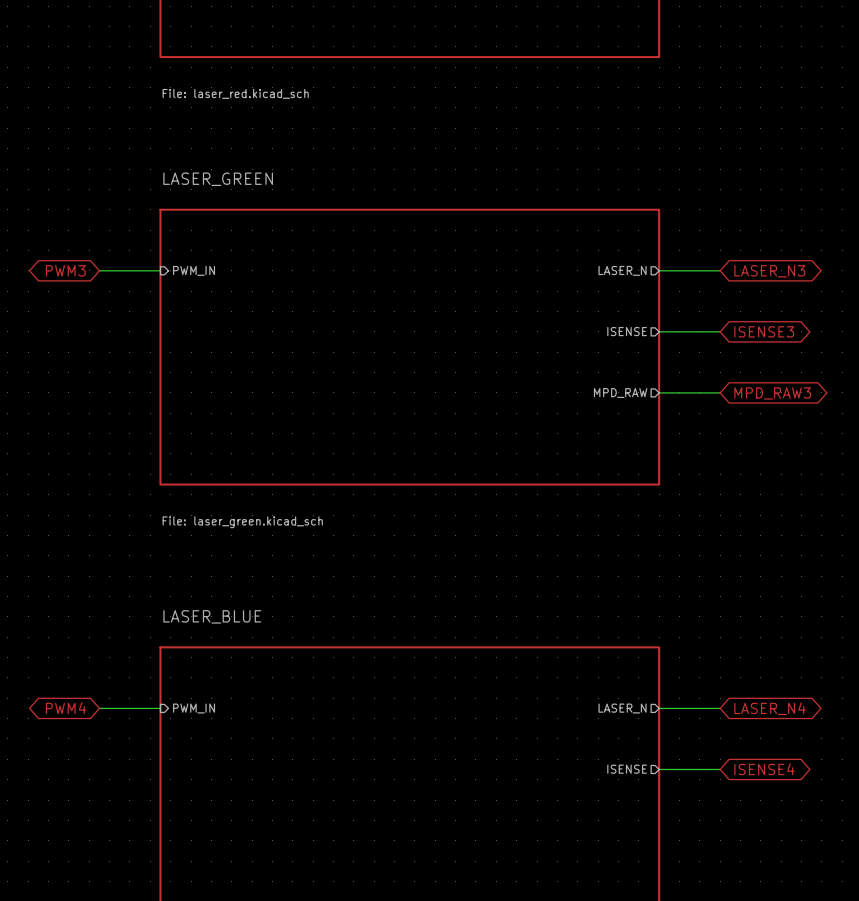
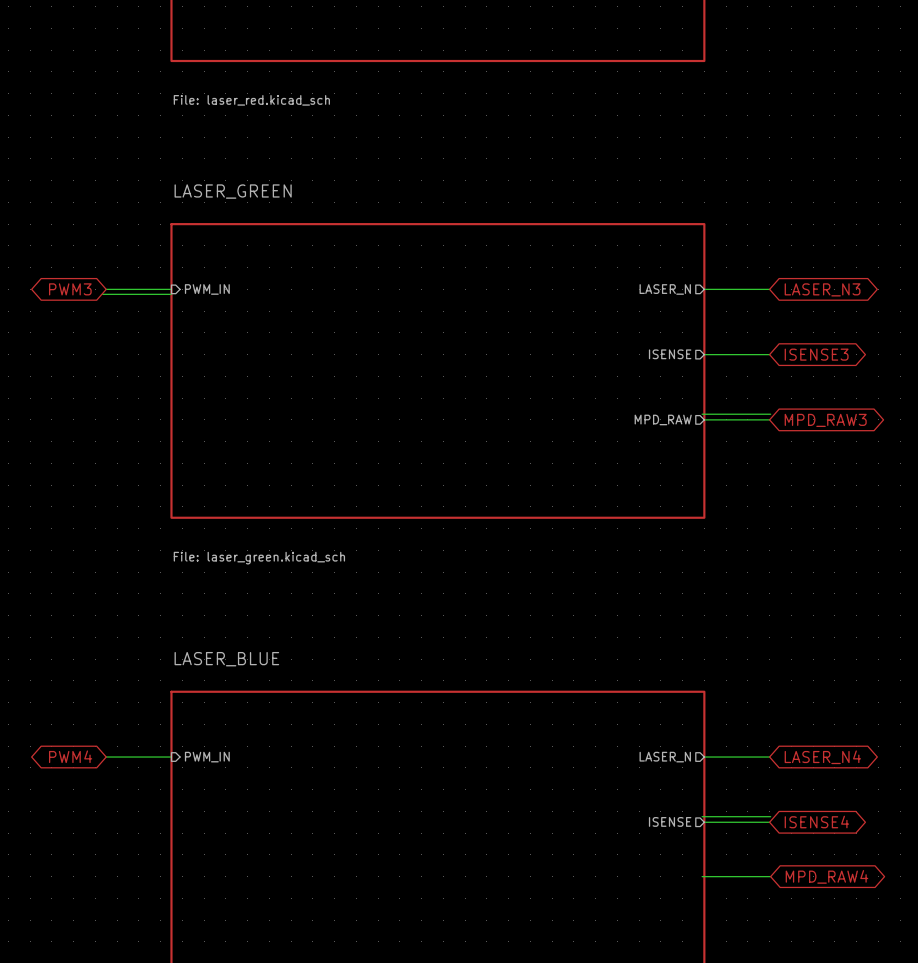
wire: none -> (102, 294) (171, 294)
wire: none -> (702, 414) (770, 414)
wire: none -> (702, 816) (770, 816)
wire: none -> (702, 876) (770, 876)
global label: none -> MPD_RAW4 (826, 876)

